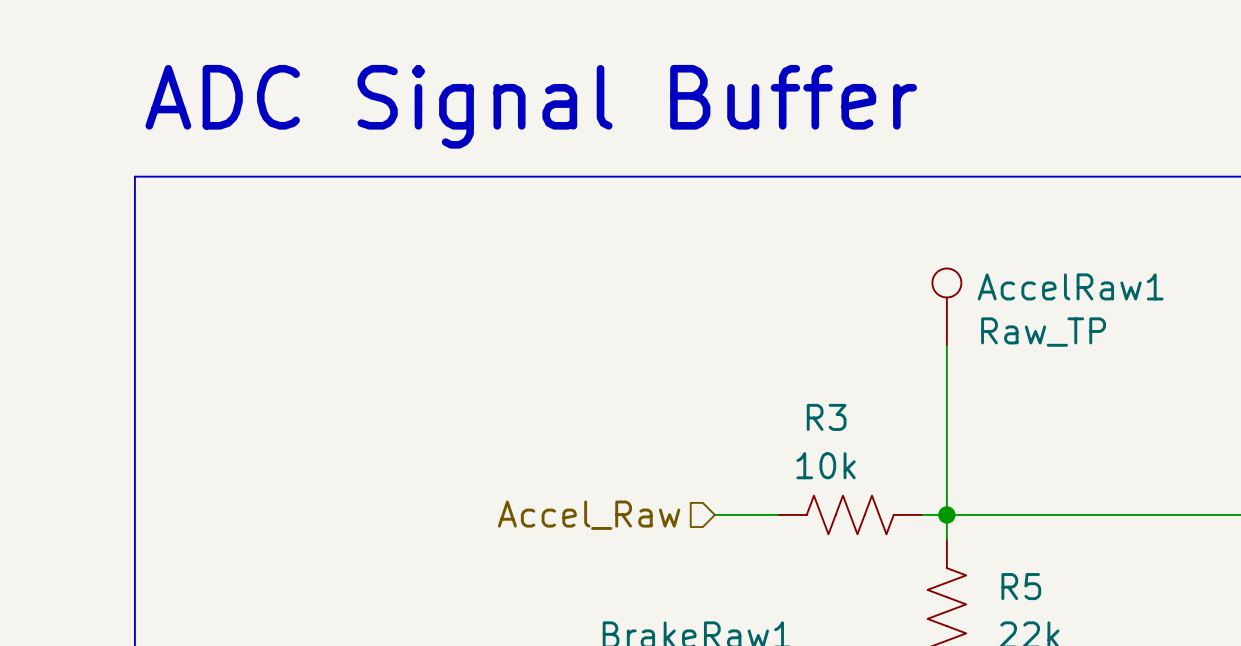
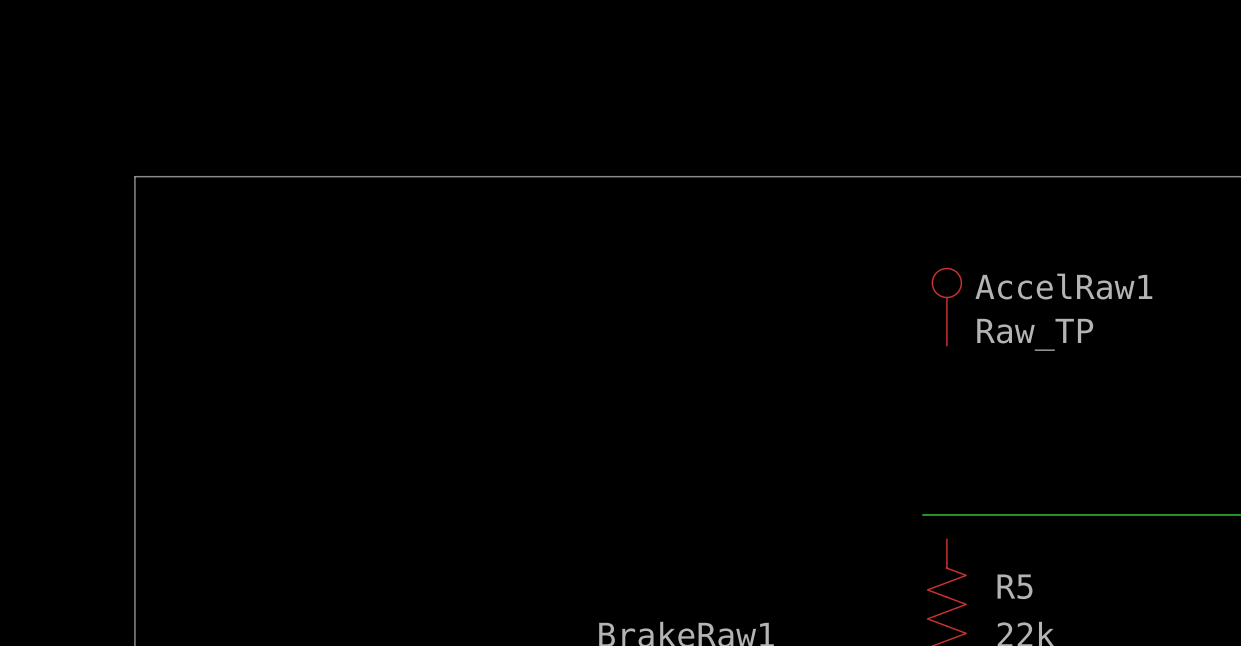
text: ADC Signal Buffer (531, 106) -> none
wire: (946, 345) (946, 539) -> none
wire: (714, 514) (777, 514) -> none
R3: 10k (850, 514) -> none
junction: (946, 514) -> none
hierarchical label: Accel_Raw (589, 515) -> none

